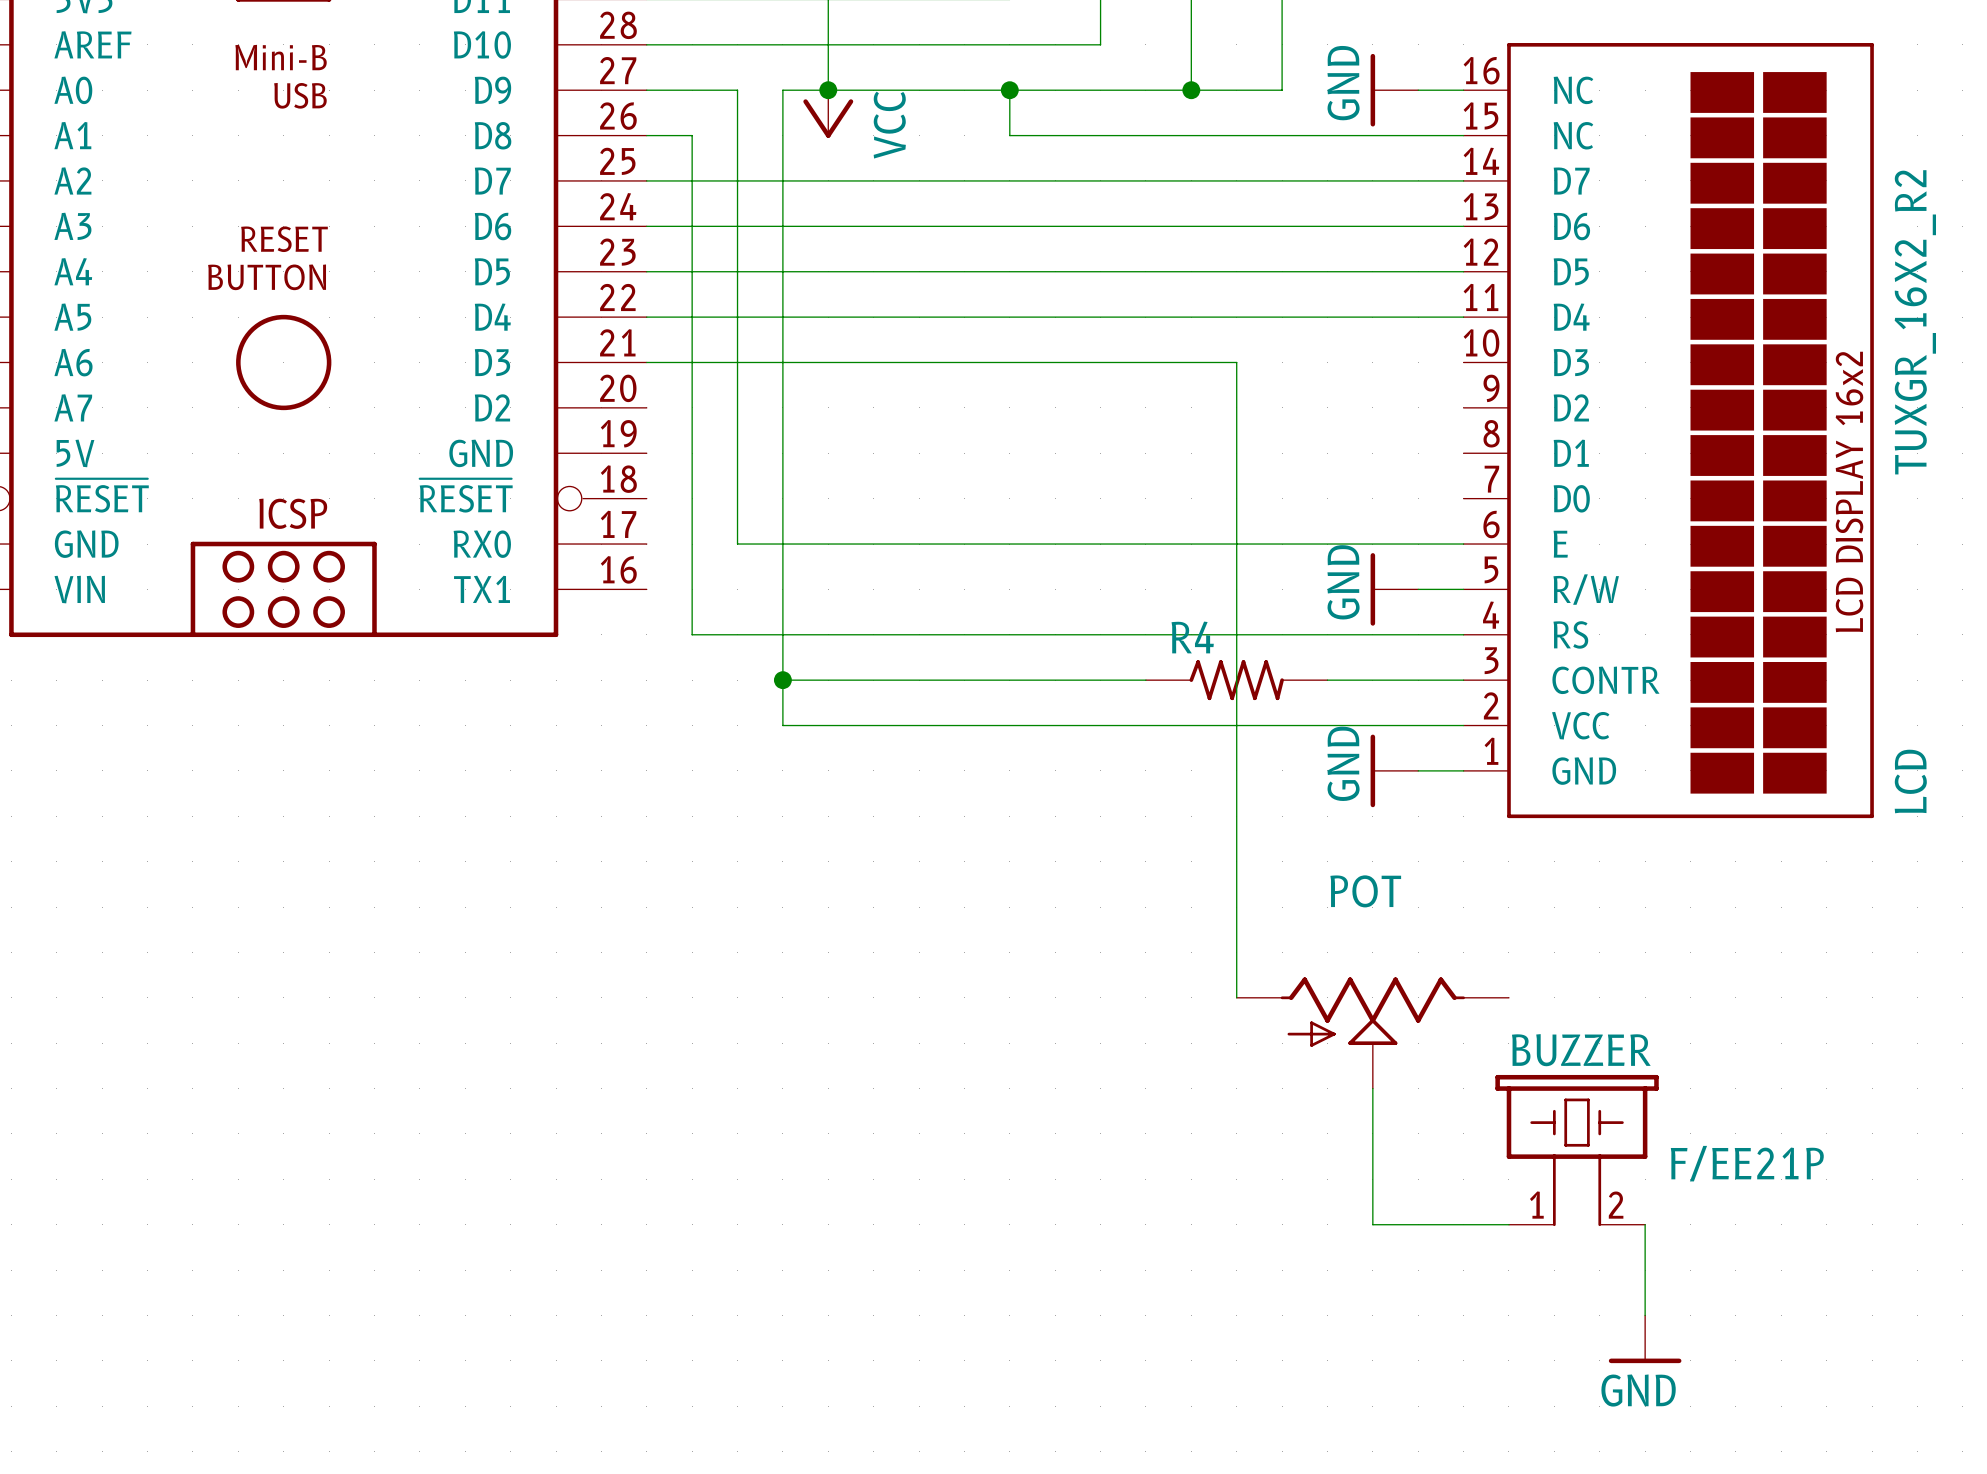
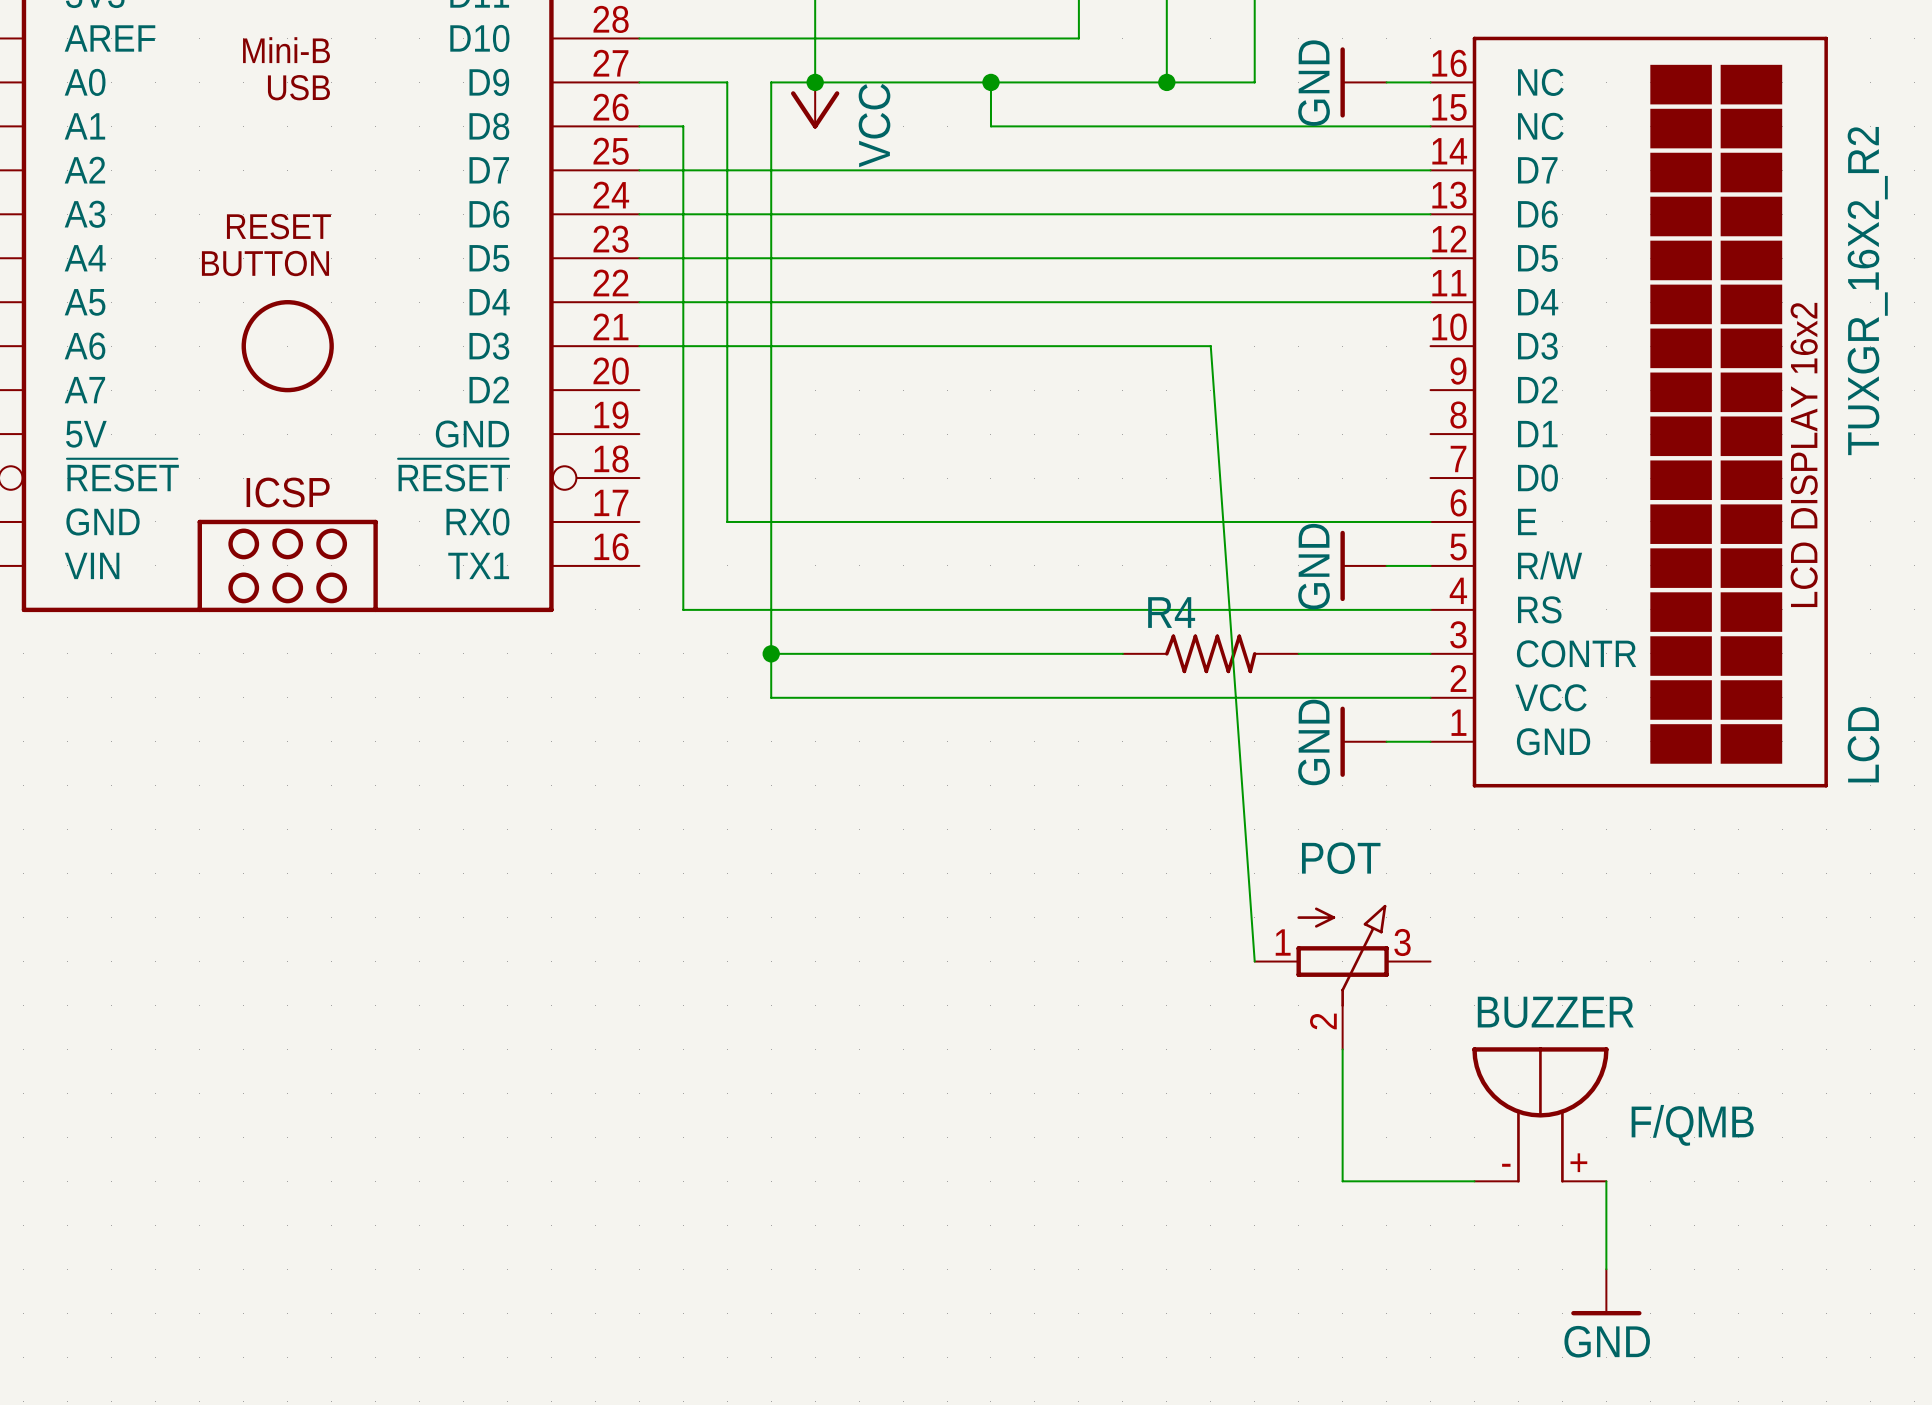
wire: (1236, 362) (1236, 997) -> (1210, 346) (1254, 961)
POT: none -> (1342, 977)
POT: (1372, 1032) -> none
BUZZER symbol: [1495, 1074, 1659, 1227] -> [1472, 1047, 1609, 1183]
BUZZER value: F/EE21P (1747, 1163) -> F/QMB (1692, 1125)

